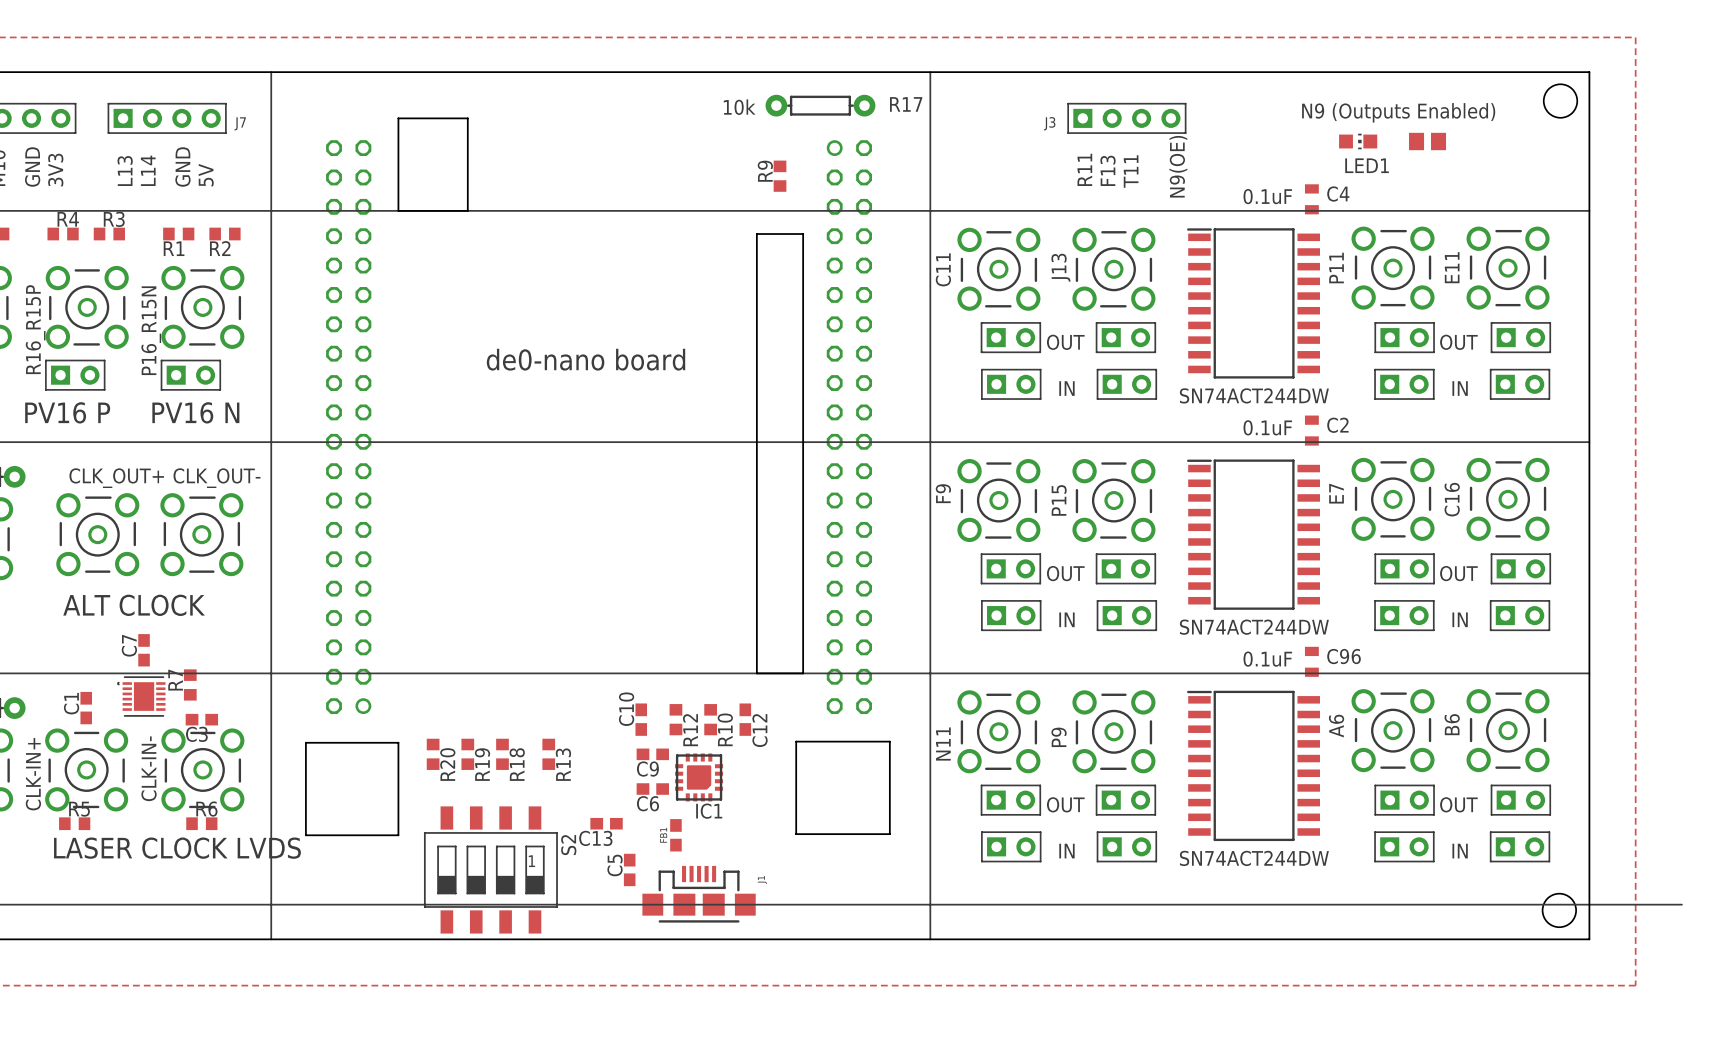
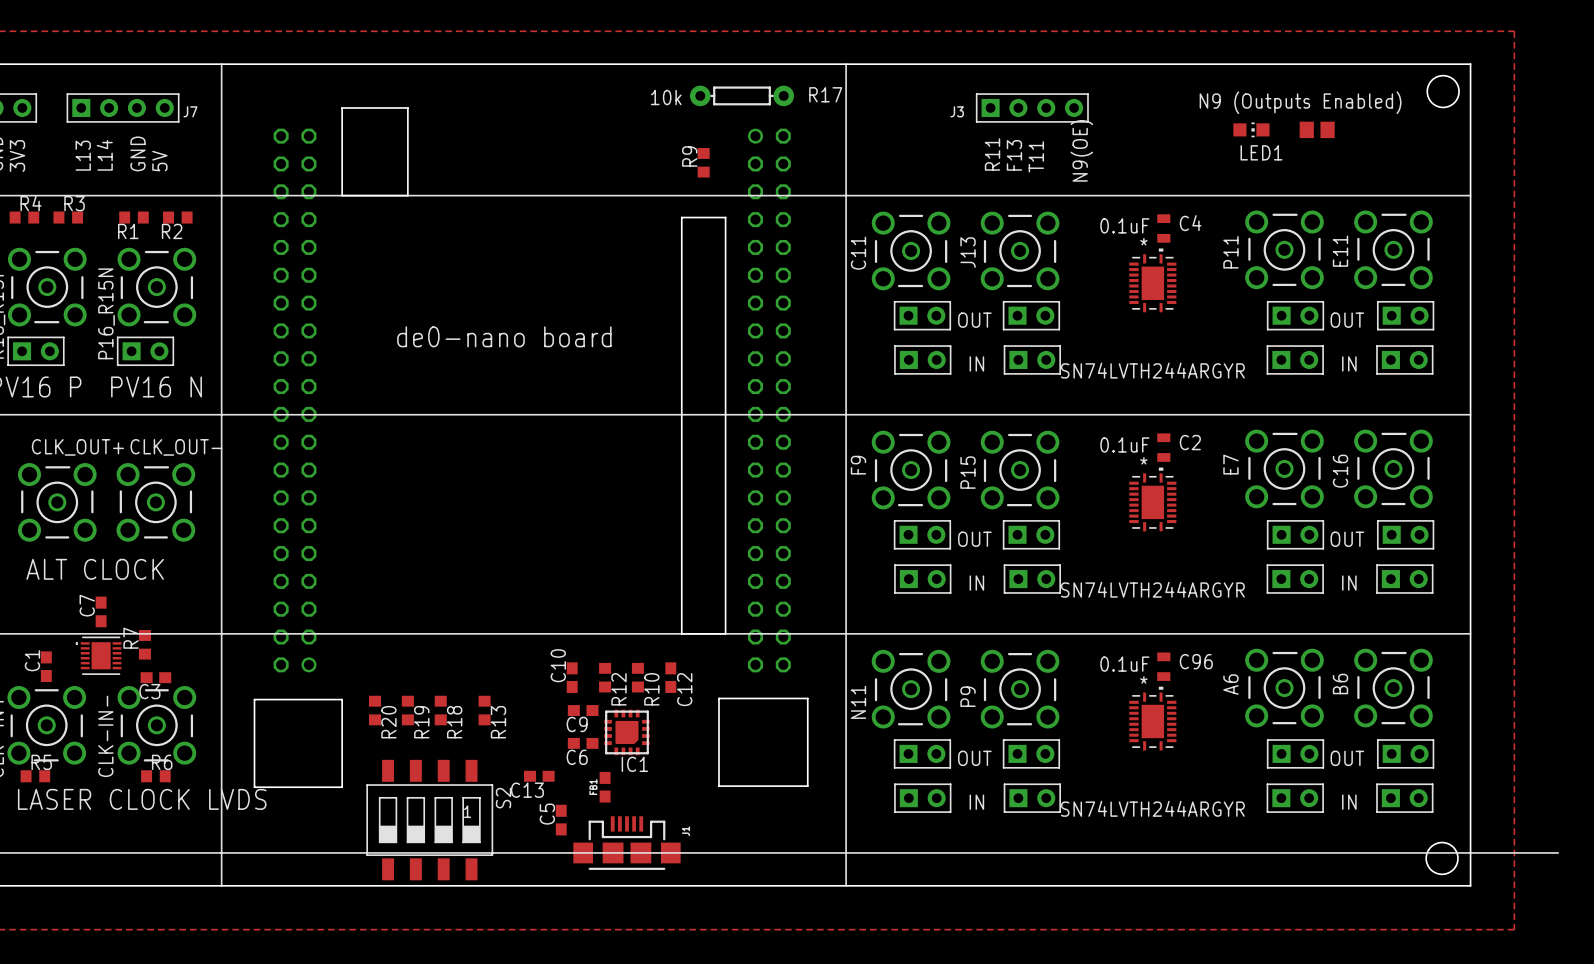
C4 position: (1311, 199) -> (1163, 228)
part footprint: [1187, 228, 1320, 379] -> [1129, 248, 1177, 313]
part value: SN74ACT244DW (1254, 395) -> SN74LVTH244ARGYR (1152, 370)
C2 position: (1311, 430) -> (1163, 447)
part footprint: [1187, 459, 1320, 610] -> [1129, 467, 1177, 532]
part value: SN74ACT244DW (1254, 627) -> SN74LVTH244ARGYR (1152, 589)
C96 position: (1311, 661) -> (1163, 666)
part footprint: [1187, 690, 1320, 842] -> [1129, 686, 1177, 751]
part value: SN74ACT244DW (1254, 858) -> SN74LVTH244ARGYR (1152, 808)

